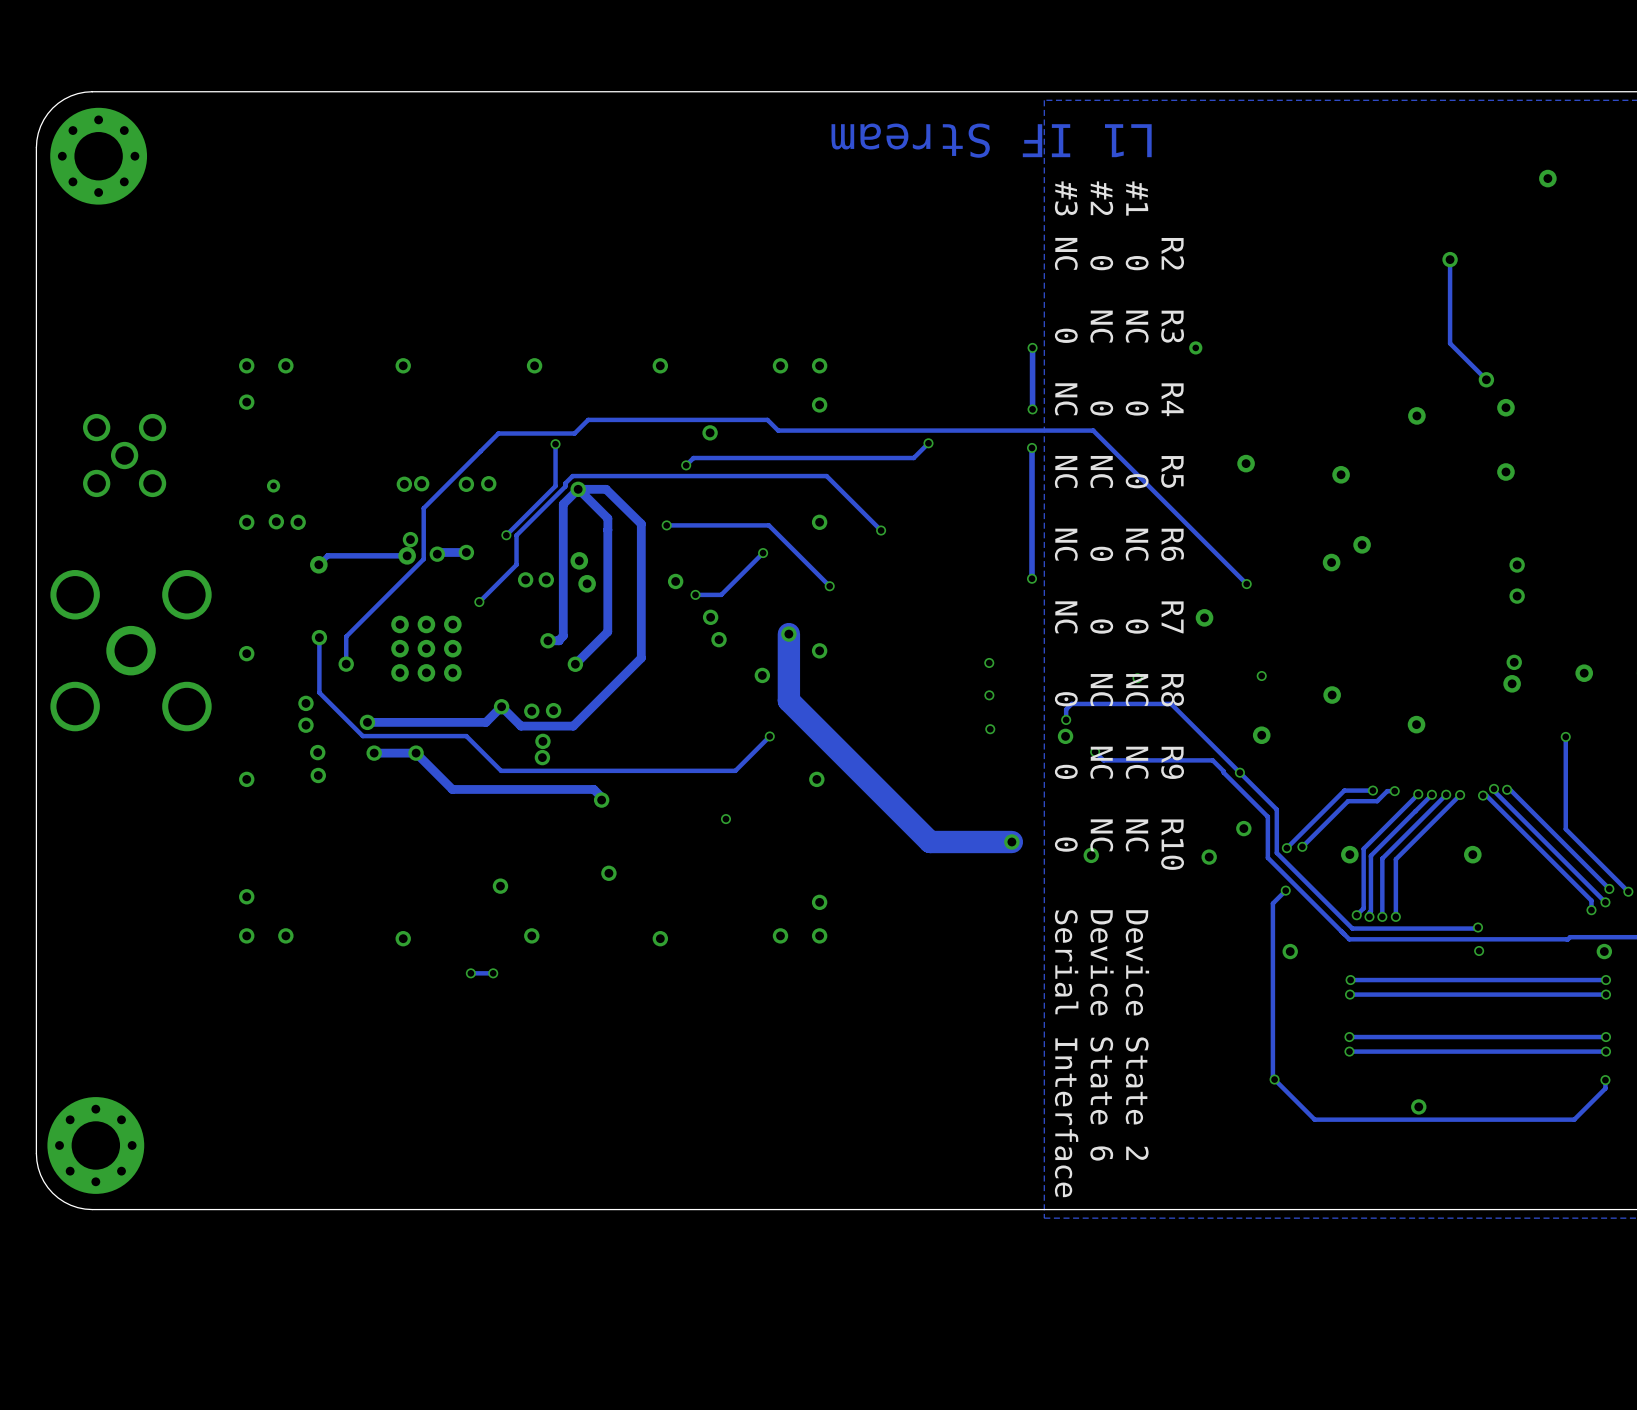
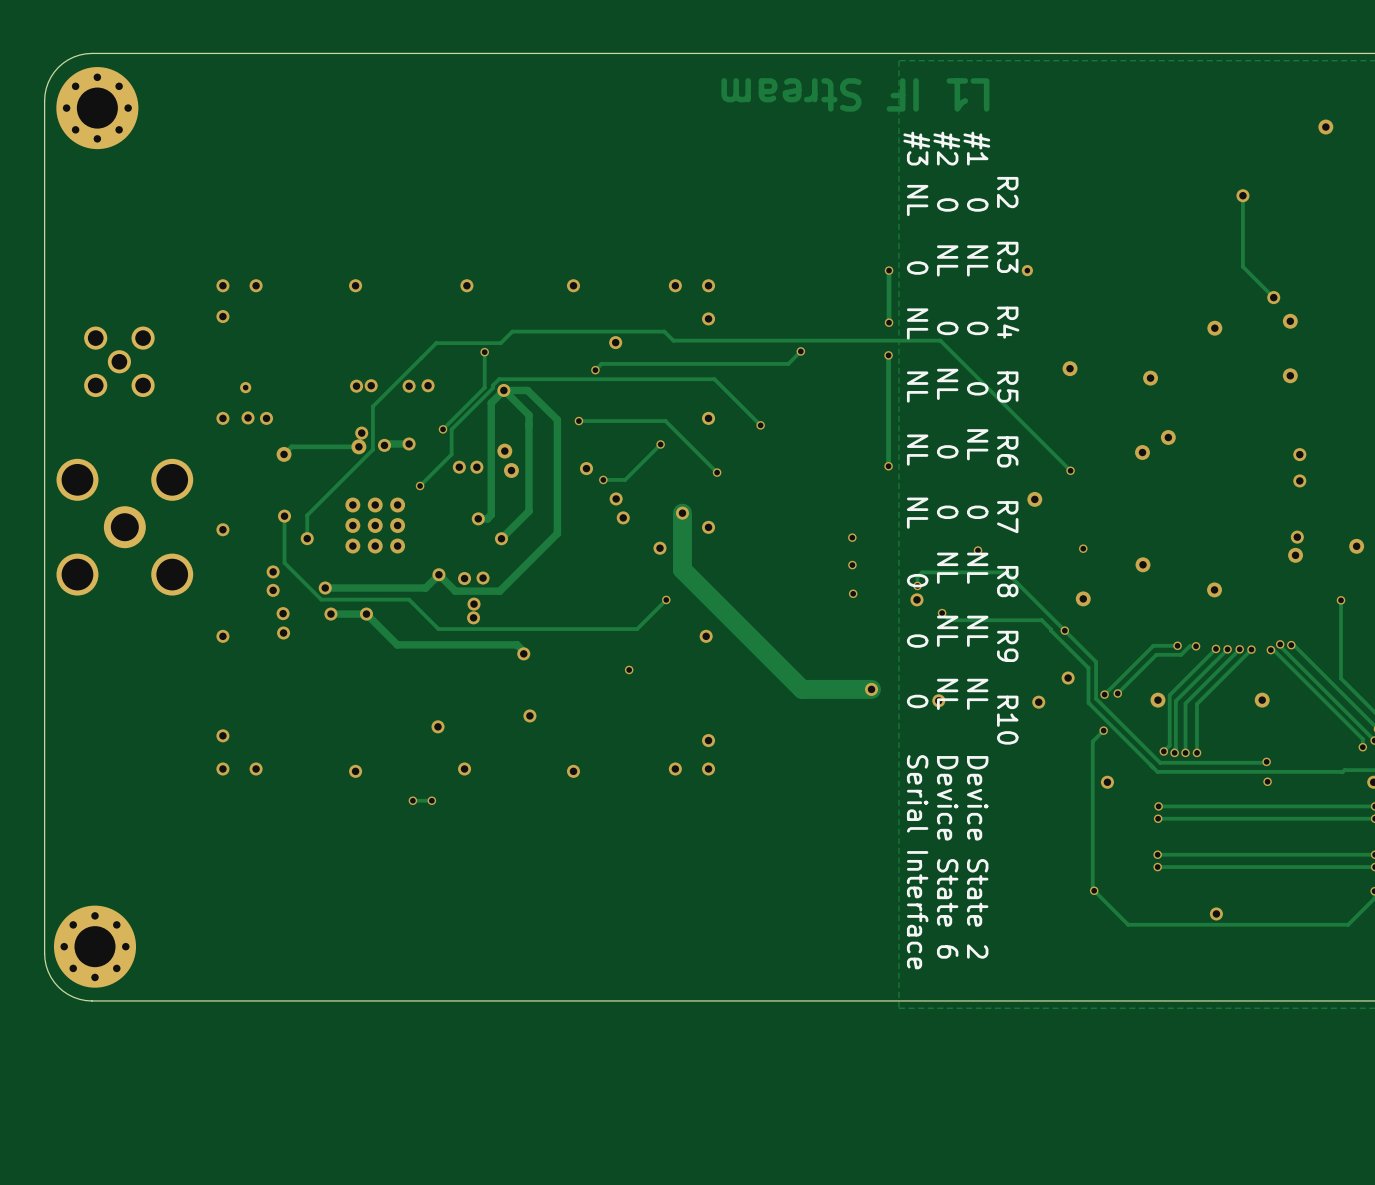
text: #1 0 NC 0 0 NC 0 NC NC NC Device State 2 (1137, 670) -> #1 0 NL 0 0 NL 0 NL NL NL Device State 2 (976, 545)
text: #2 0 NC 0 NC 0 0 NC NC NC Device State 6 (1102, 671) -> #2 0 NL 0 NL 0 0 NL NL NL Device State 6 (946, 545)
text: #3 NC 0 NC NC NC NC 0 0 0 Serial Interface (1066, 689) -> #3 NL 0 NL NL NL NL 0 0 0 Serial Interface (916, 550)

